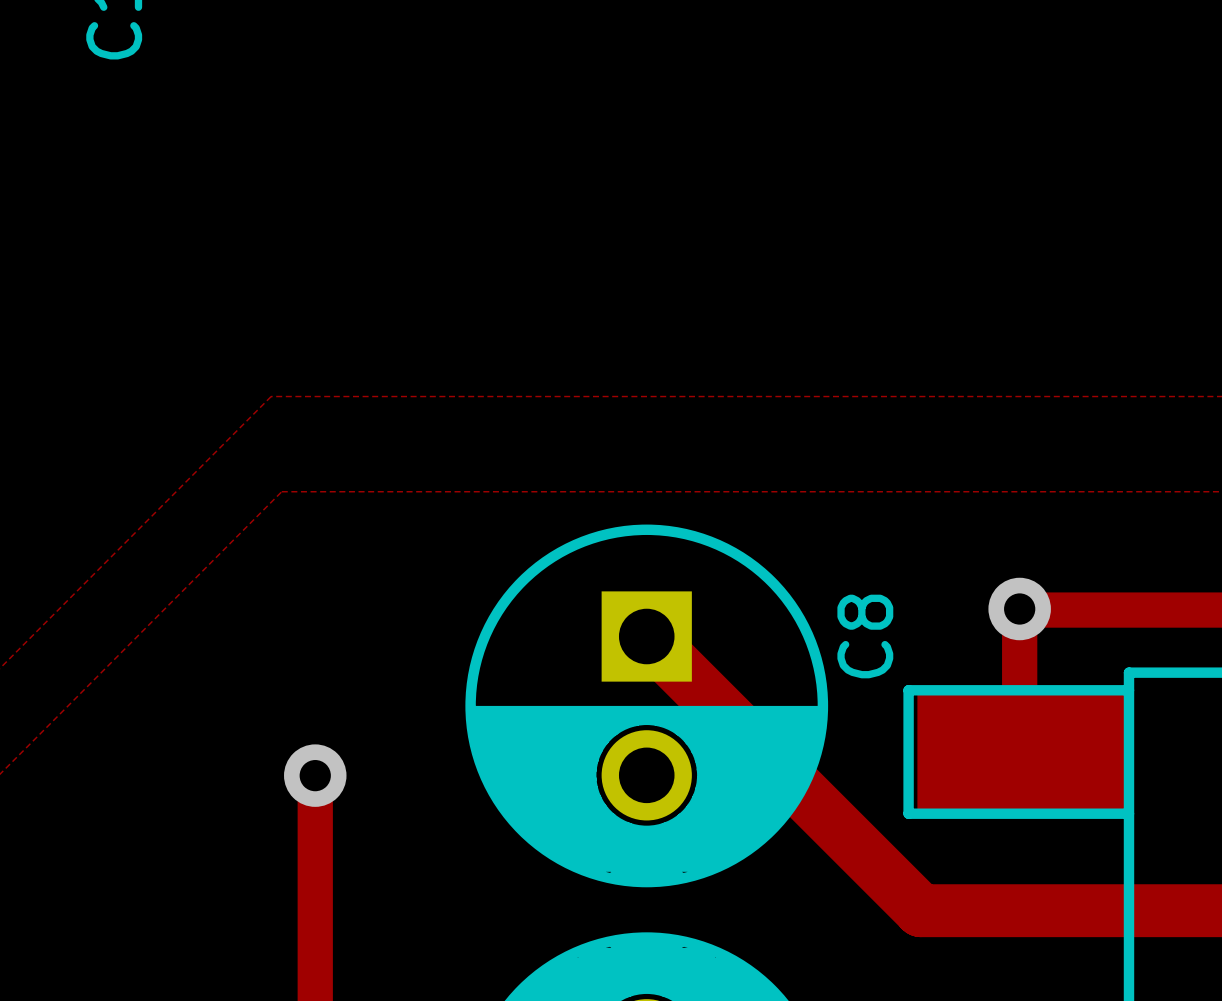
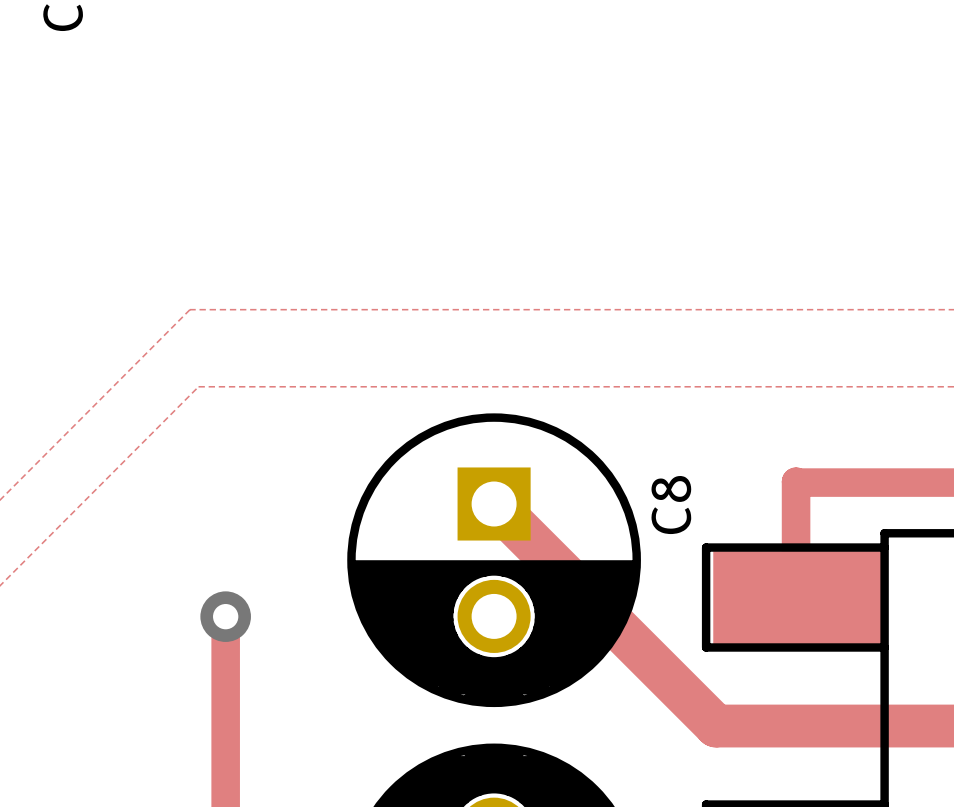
via: (1019, 609) -> none

